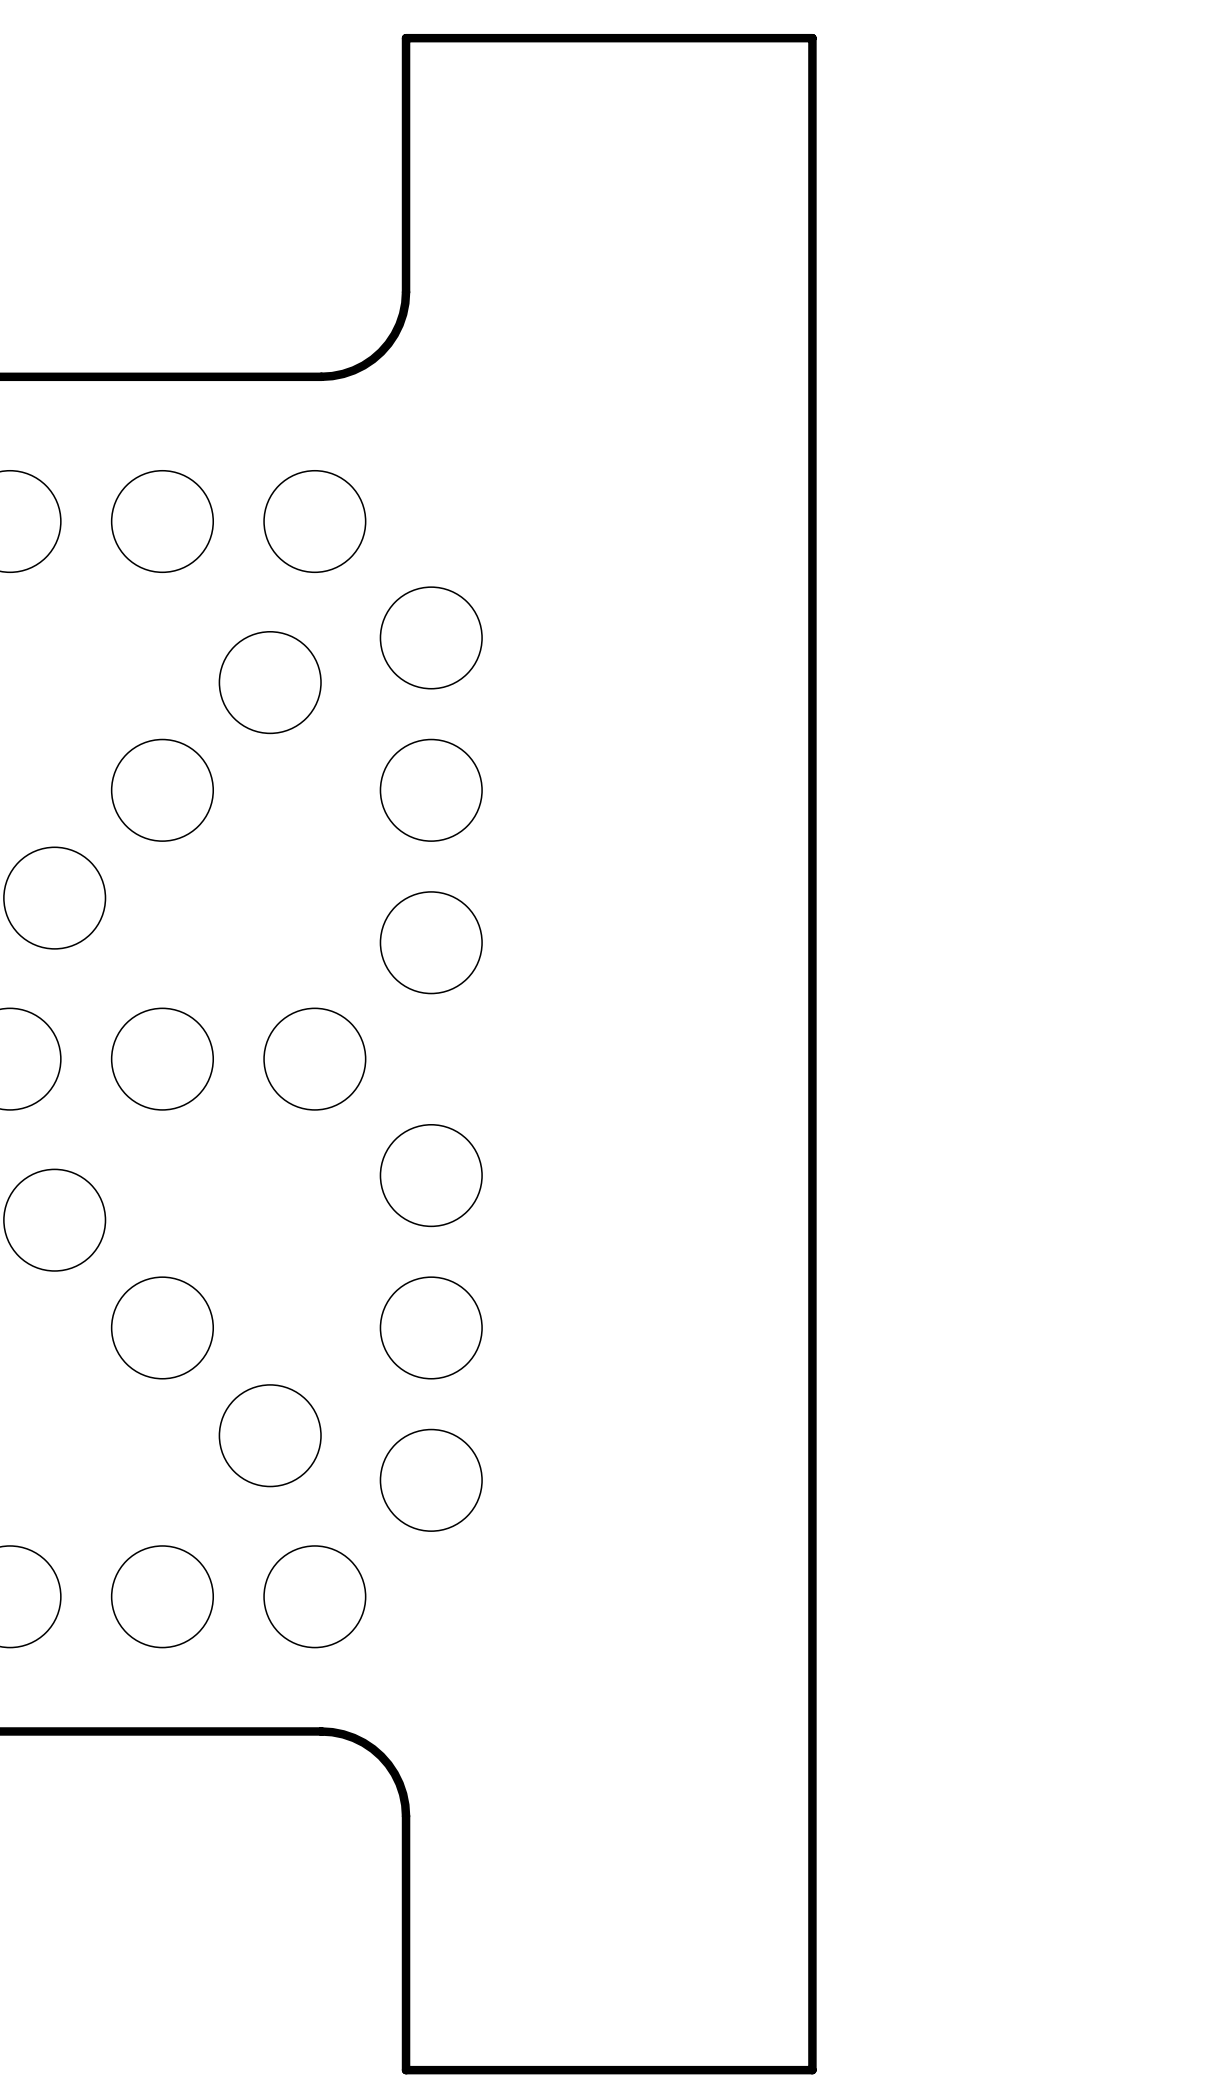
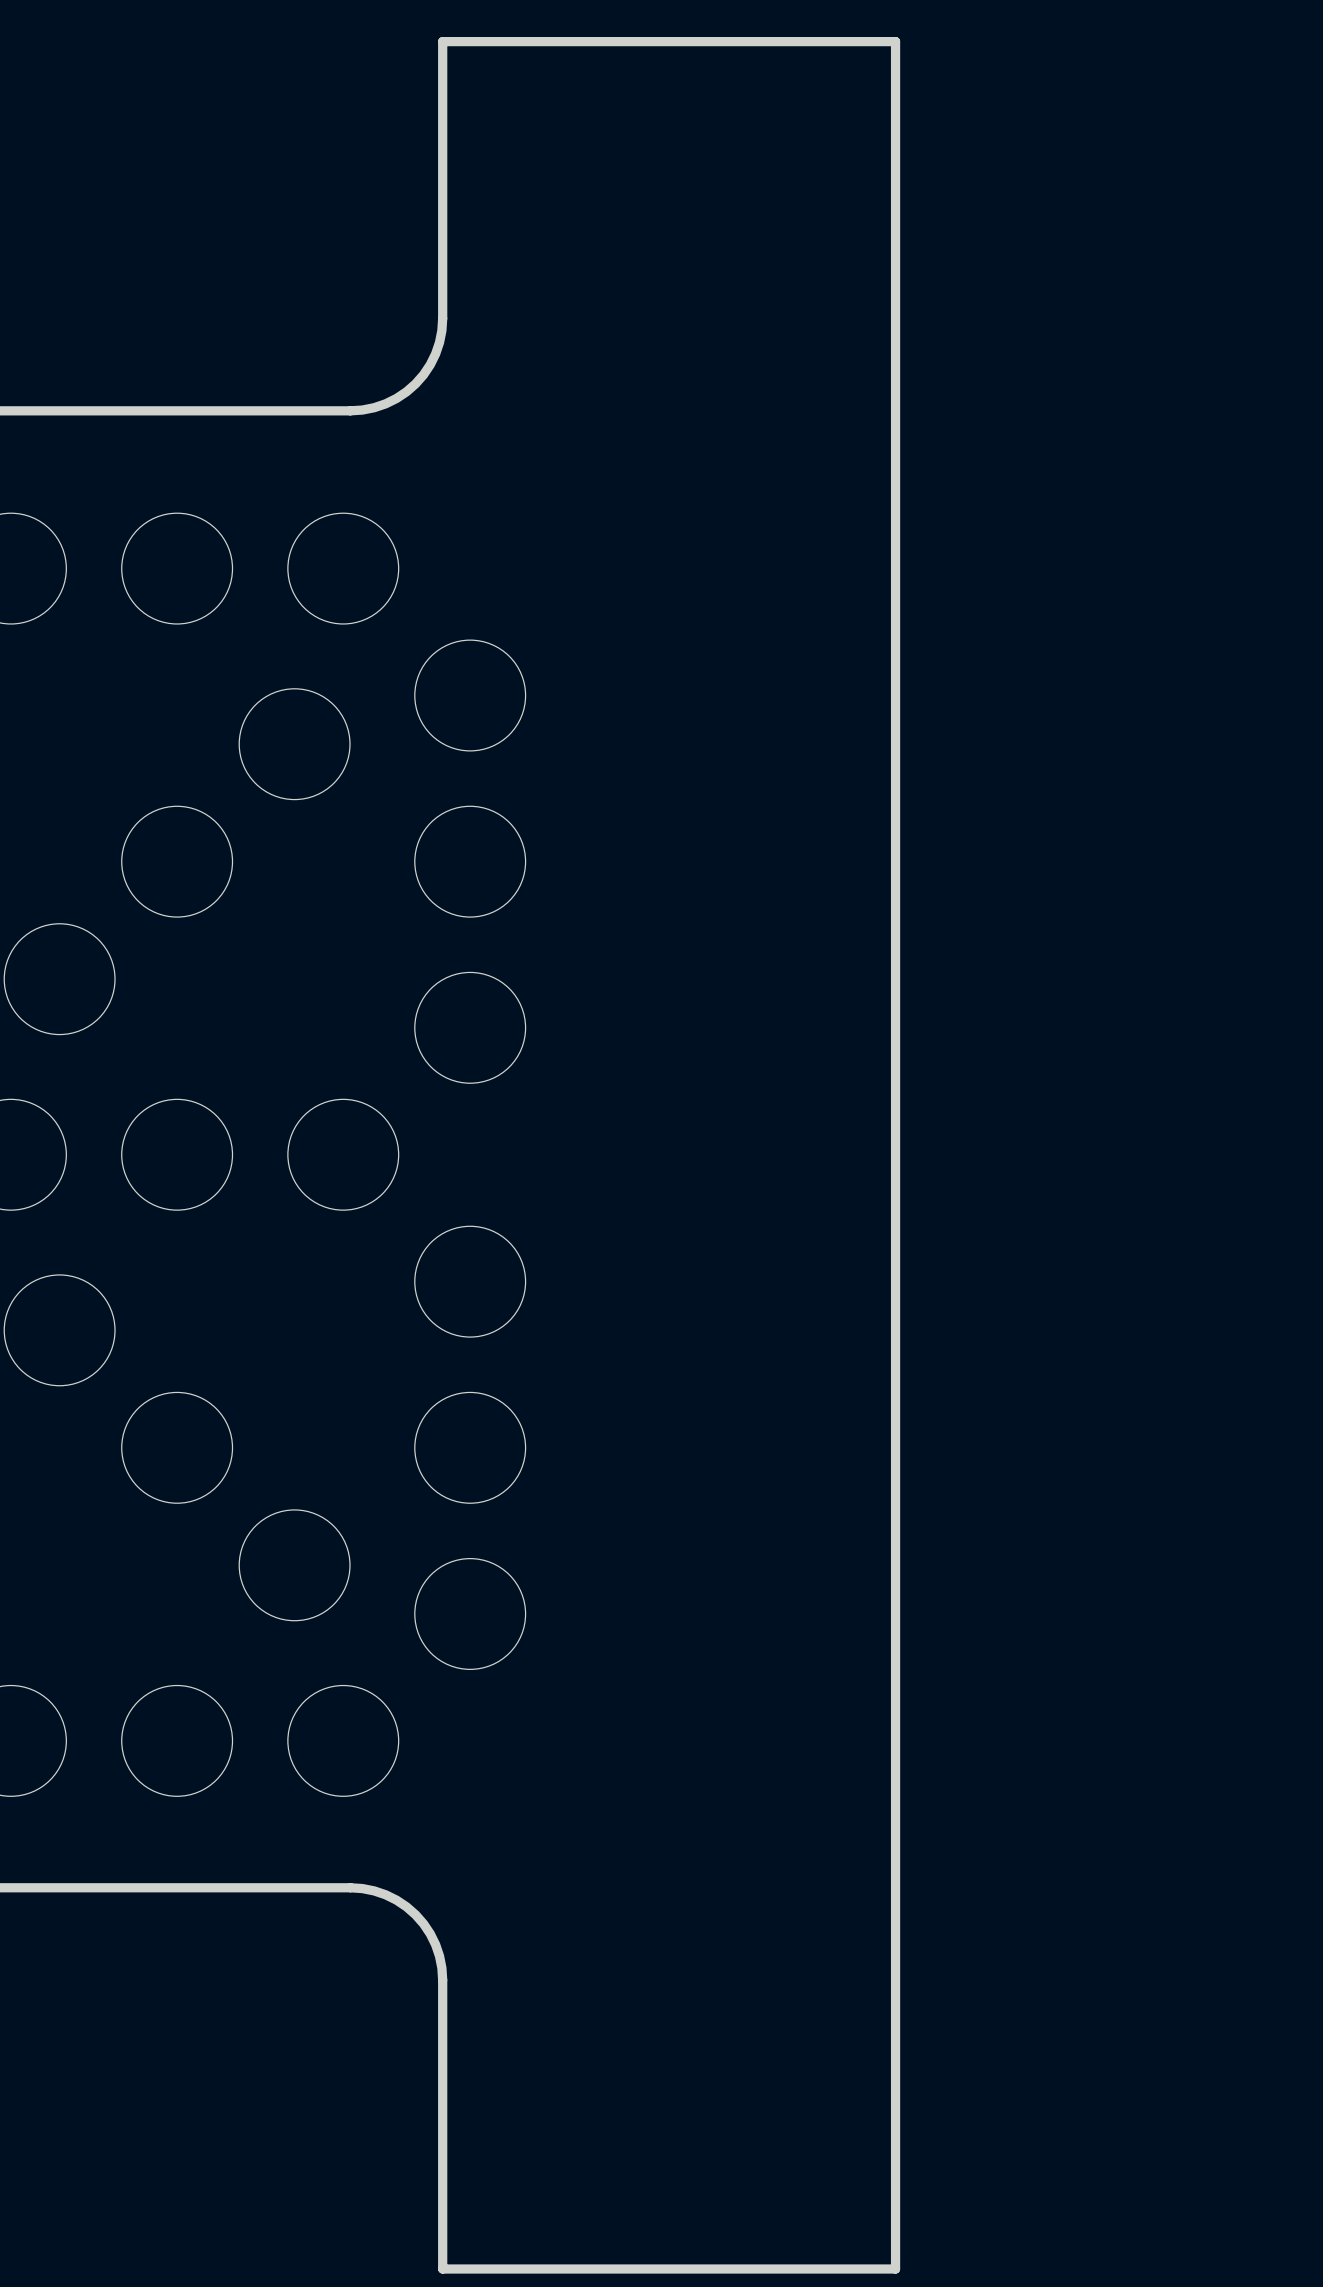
board edge: (812, 38) (812, 2070) (406, 2070) -> (885, 41) (895, 41) (895, 2269) (442, 2269) (442, 2257)

